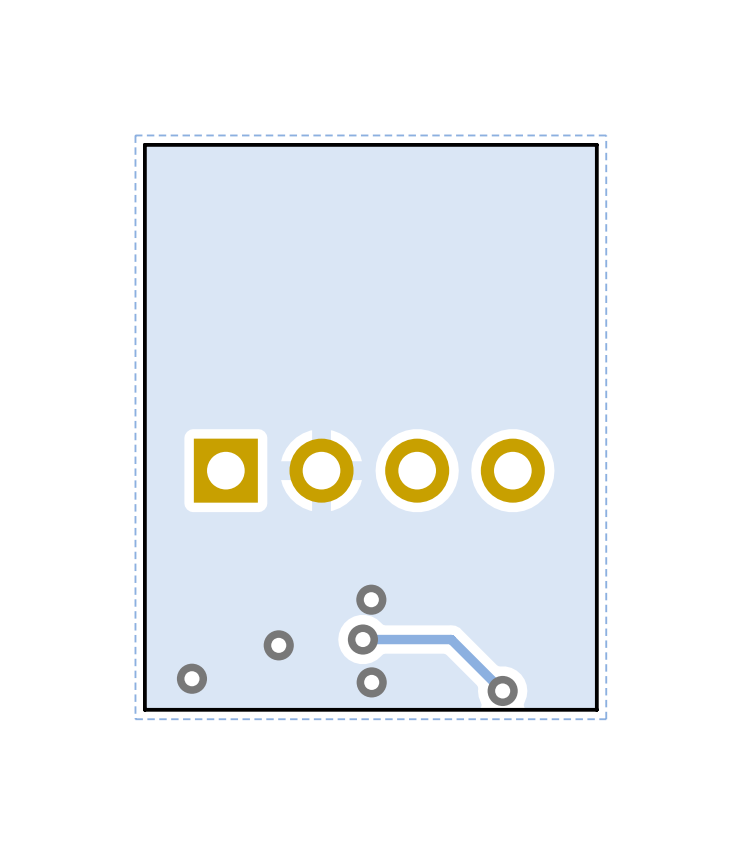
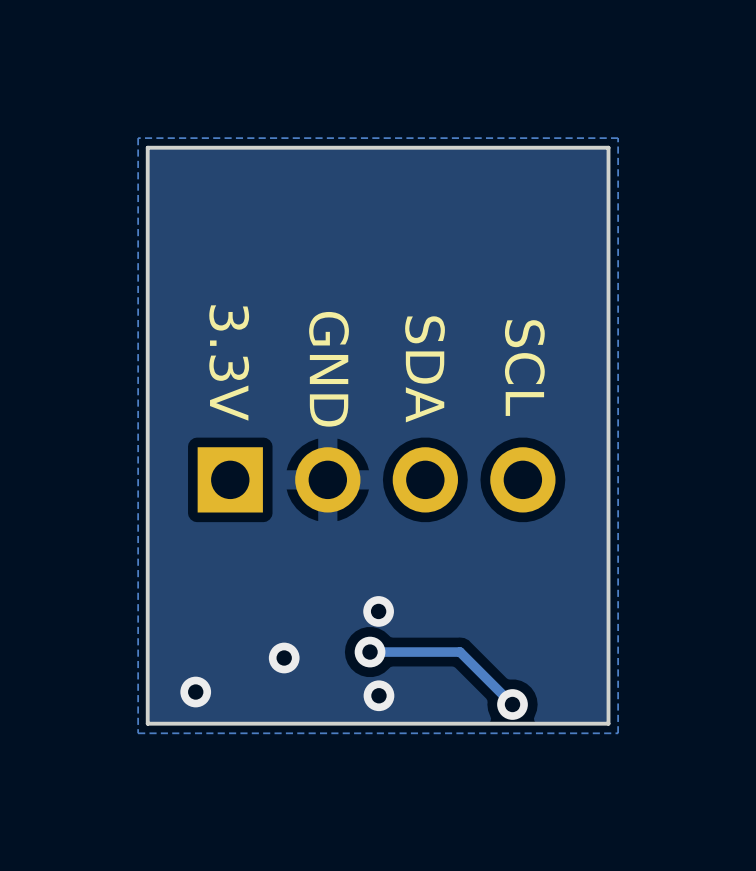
text: none -> 3.3V (229, 363)
text: none -> GND (329, 369)
text: none -> SDA (425, 369)
text: none -> SCL (524, 368)

